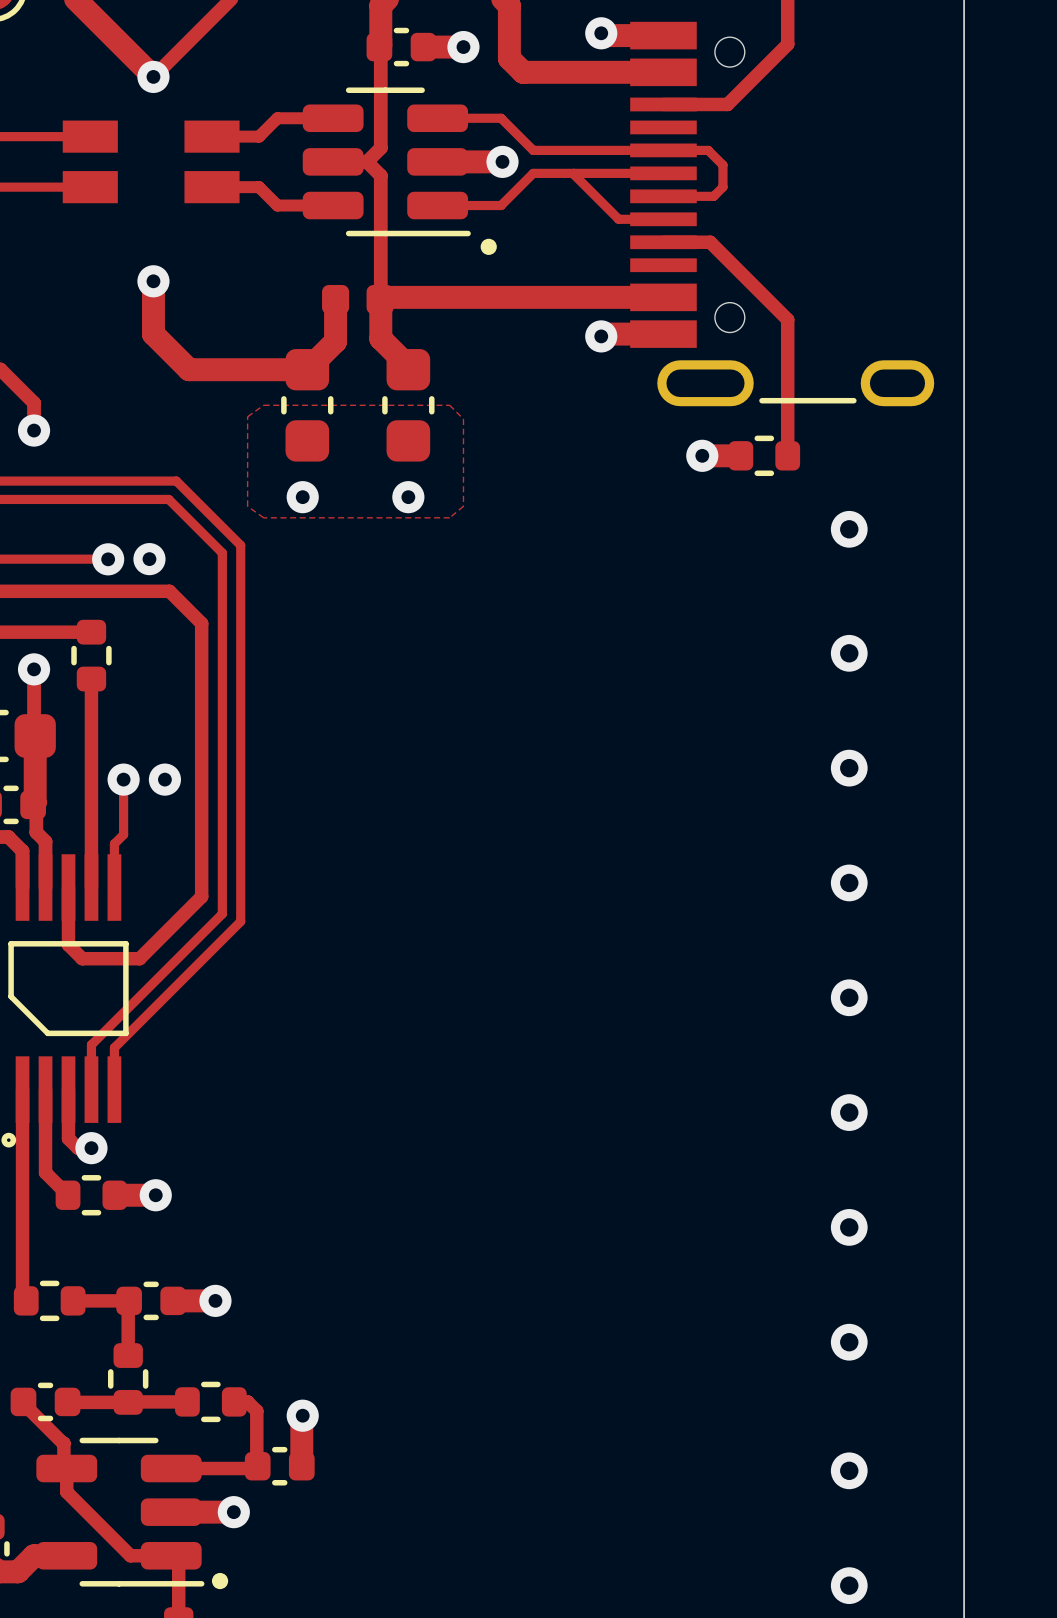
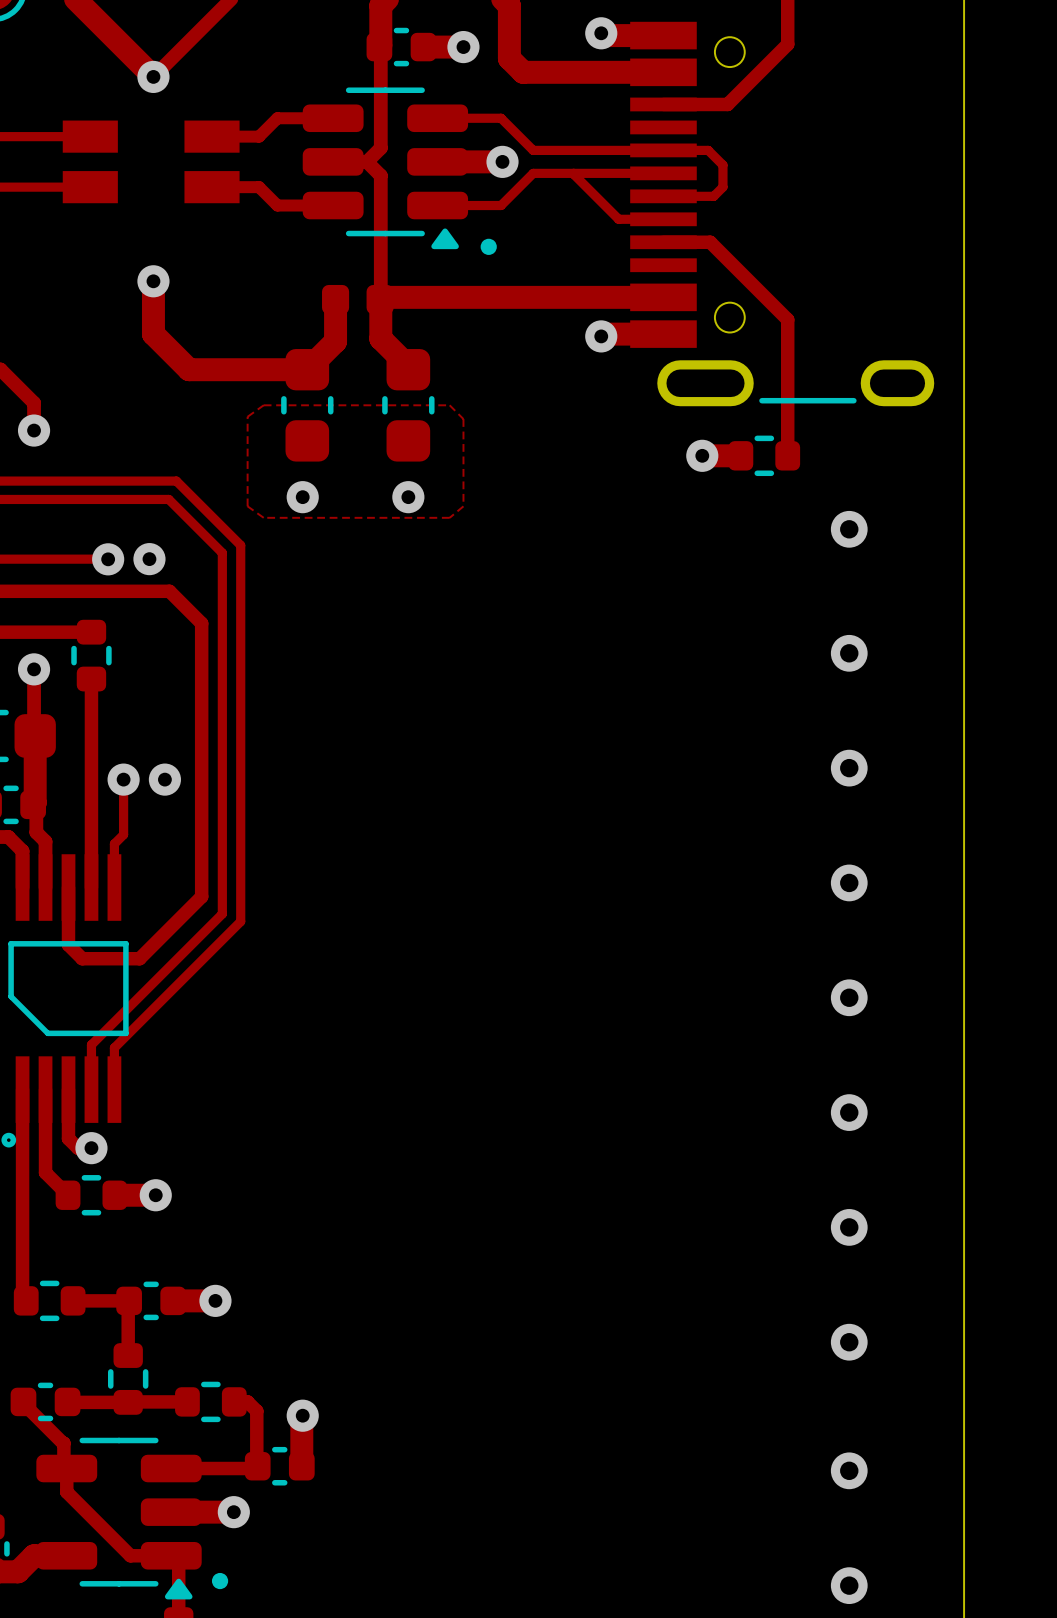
part footprint: [302, 87, 471, 237] -> [302, 87, 469, 250]
part footprint: [36, 1437, 205, 1587] -> [36, 1437, 202, 1600]

